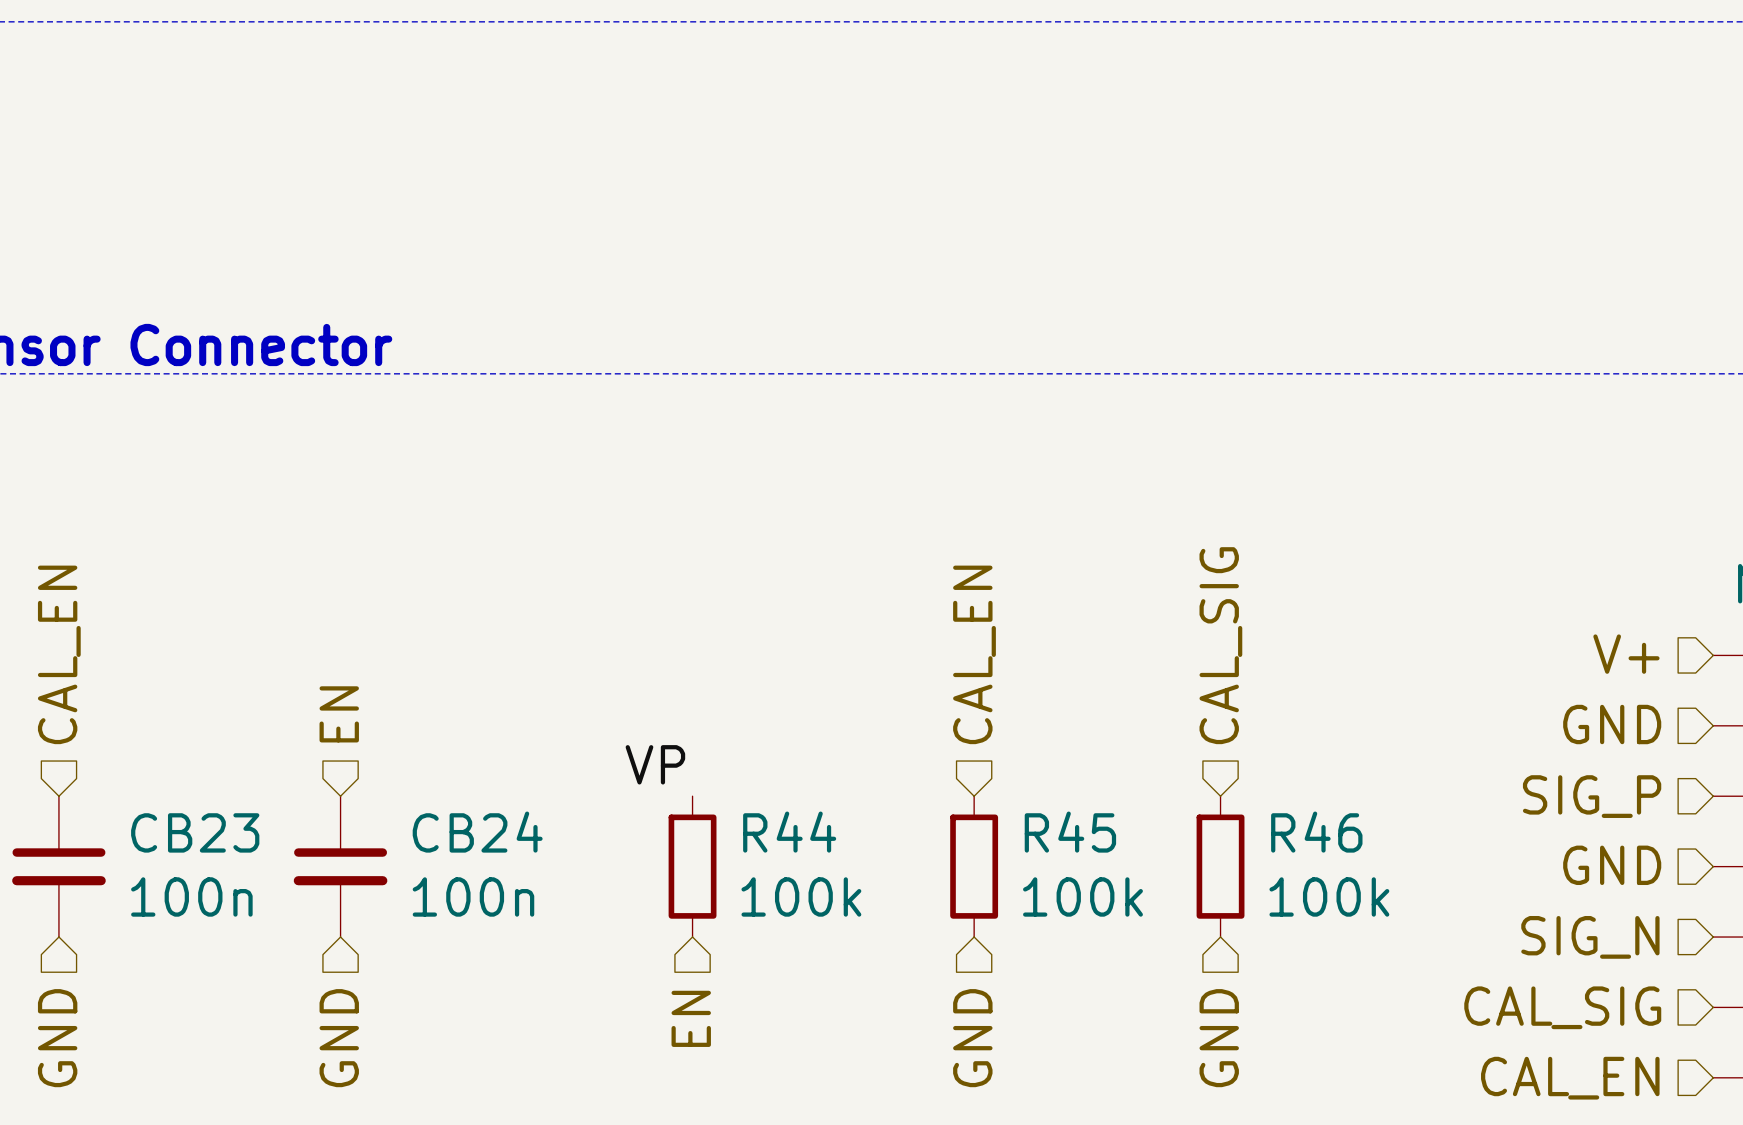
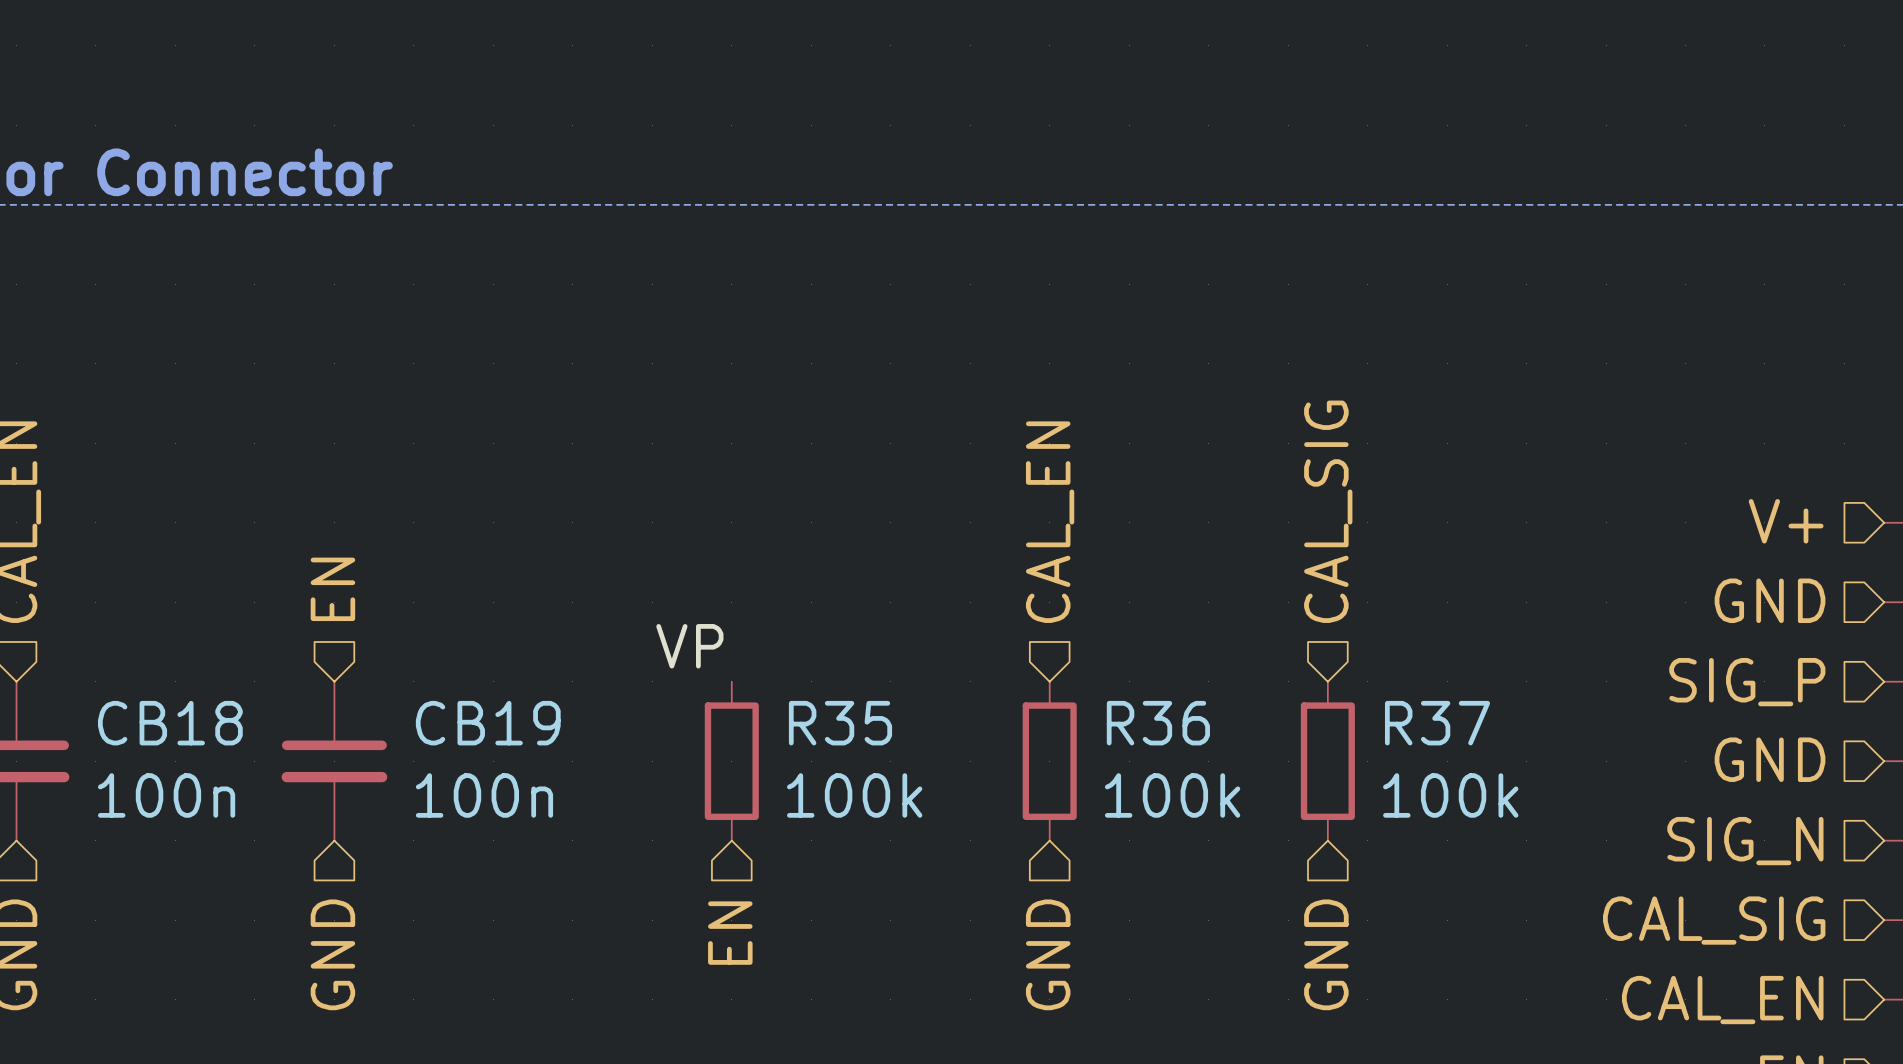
CB23 name: CB23 (195, 832) -> CB18 (170, 723)
CB24 name: CB24 (477, 832) -> CB19 (488, 723)
R44 name: R44 (789, 832) -> R35 (840, 723)
R45 name: R45 (1070, 832) -> R36 (1158, 723)
R46 name: R46 (1316, 832) -> R37 (1437, 723)

